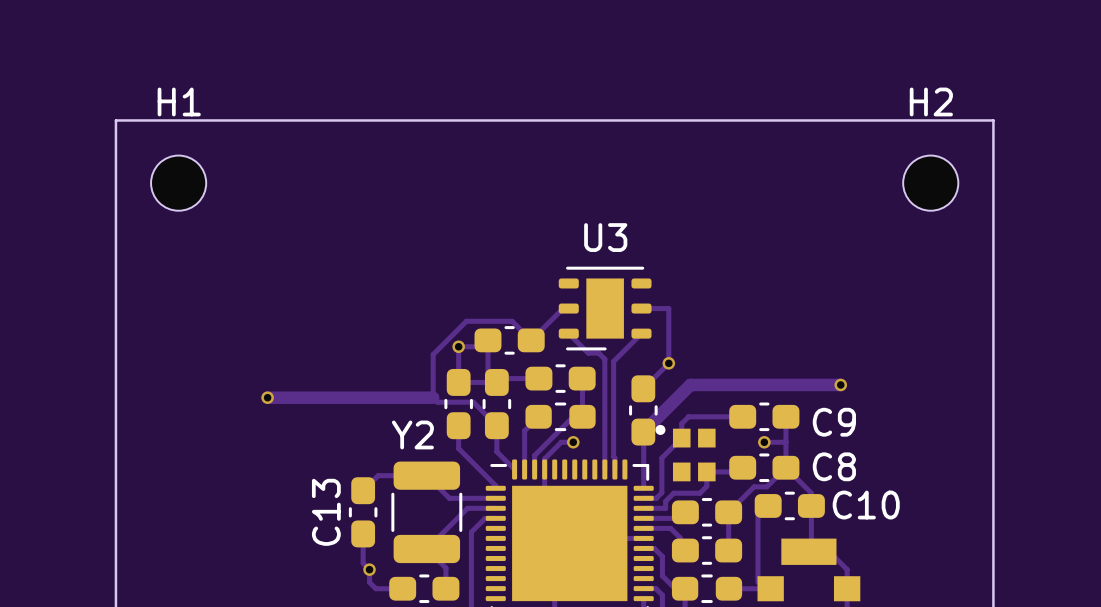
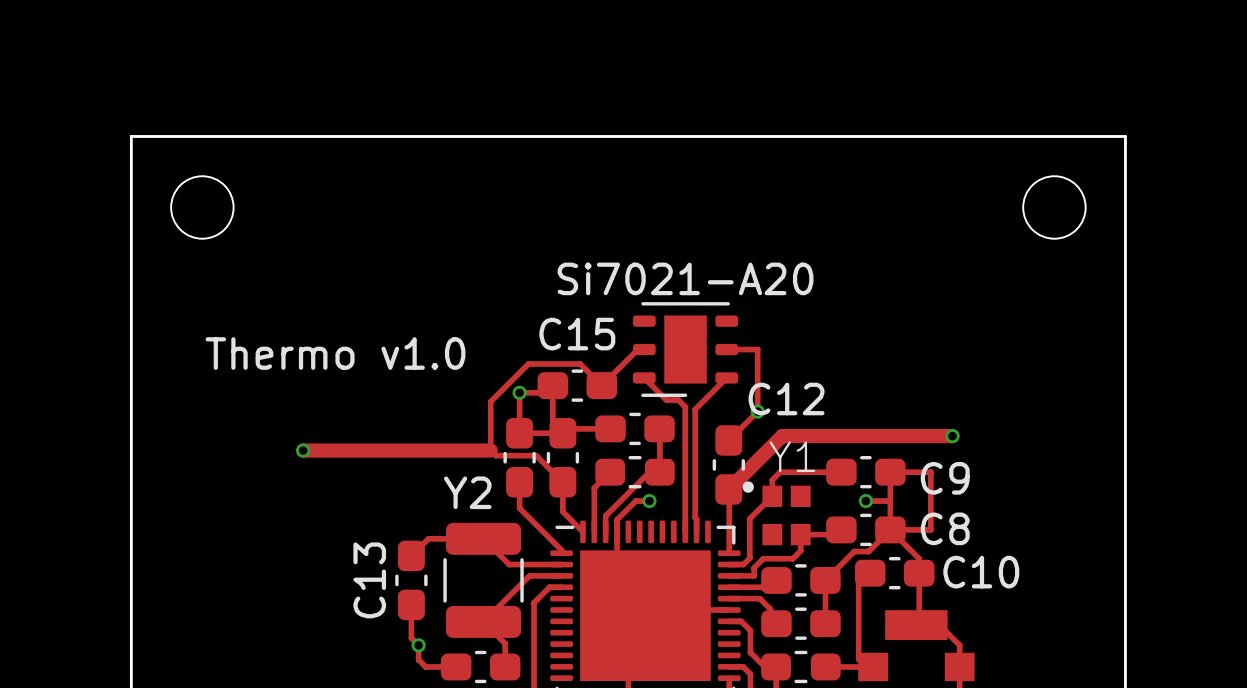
H1 name: H1 (179, 101) -> none
H2 name: H2 (931, 101) -> none
U3 name: U3 (605, 237) -> none
U3 value: none -> Si7021-A20 (685, 278)
C15 name: none -> C15 (577, 334)
text: none -> Thermo v1.0 (335, 353)
C12 name: none -> C12 (786, 398)
Y1 name: none -> Y1 (792, 456)
track: none -> (890, 472) (930, 472) (930, 529) (890, 529)

